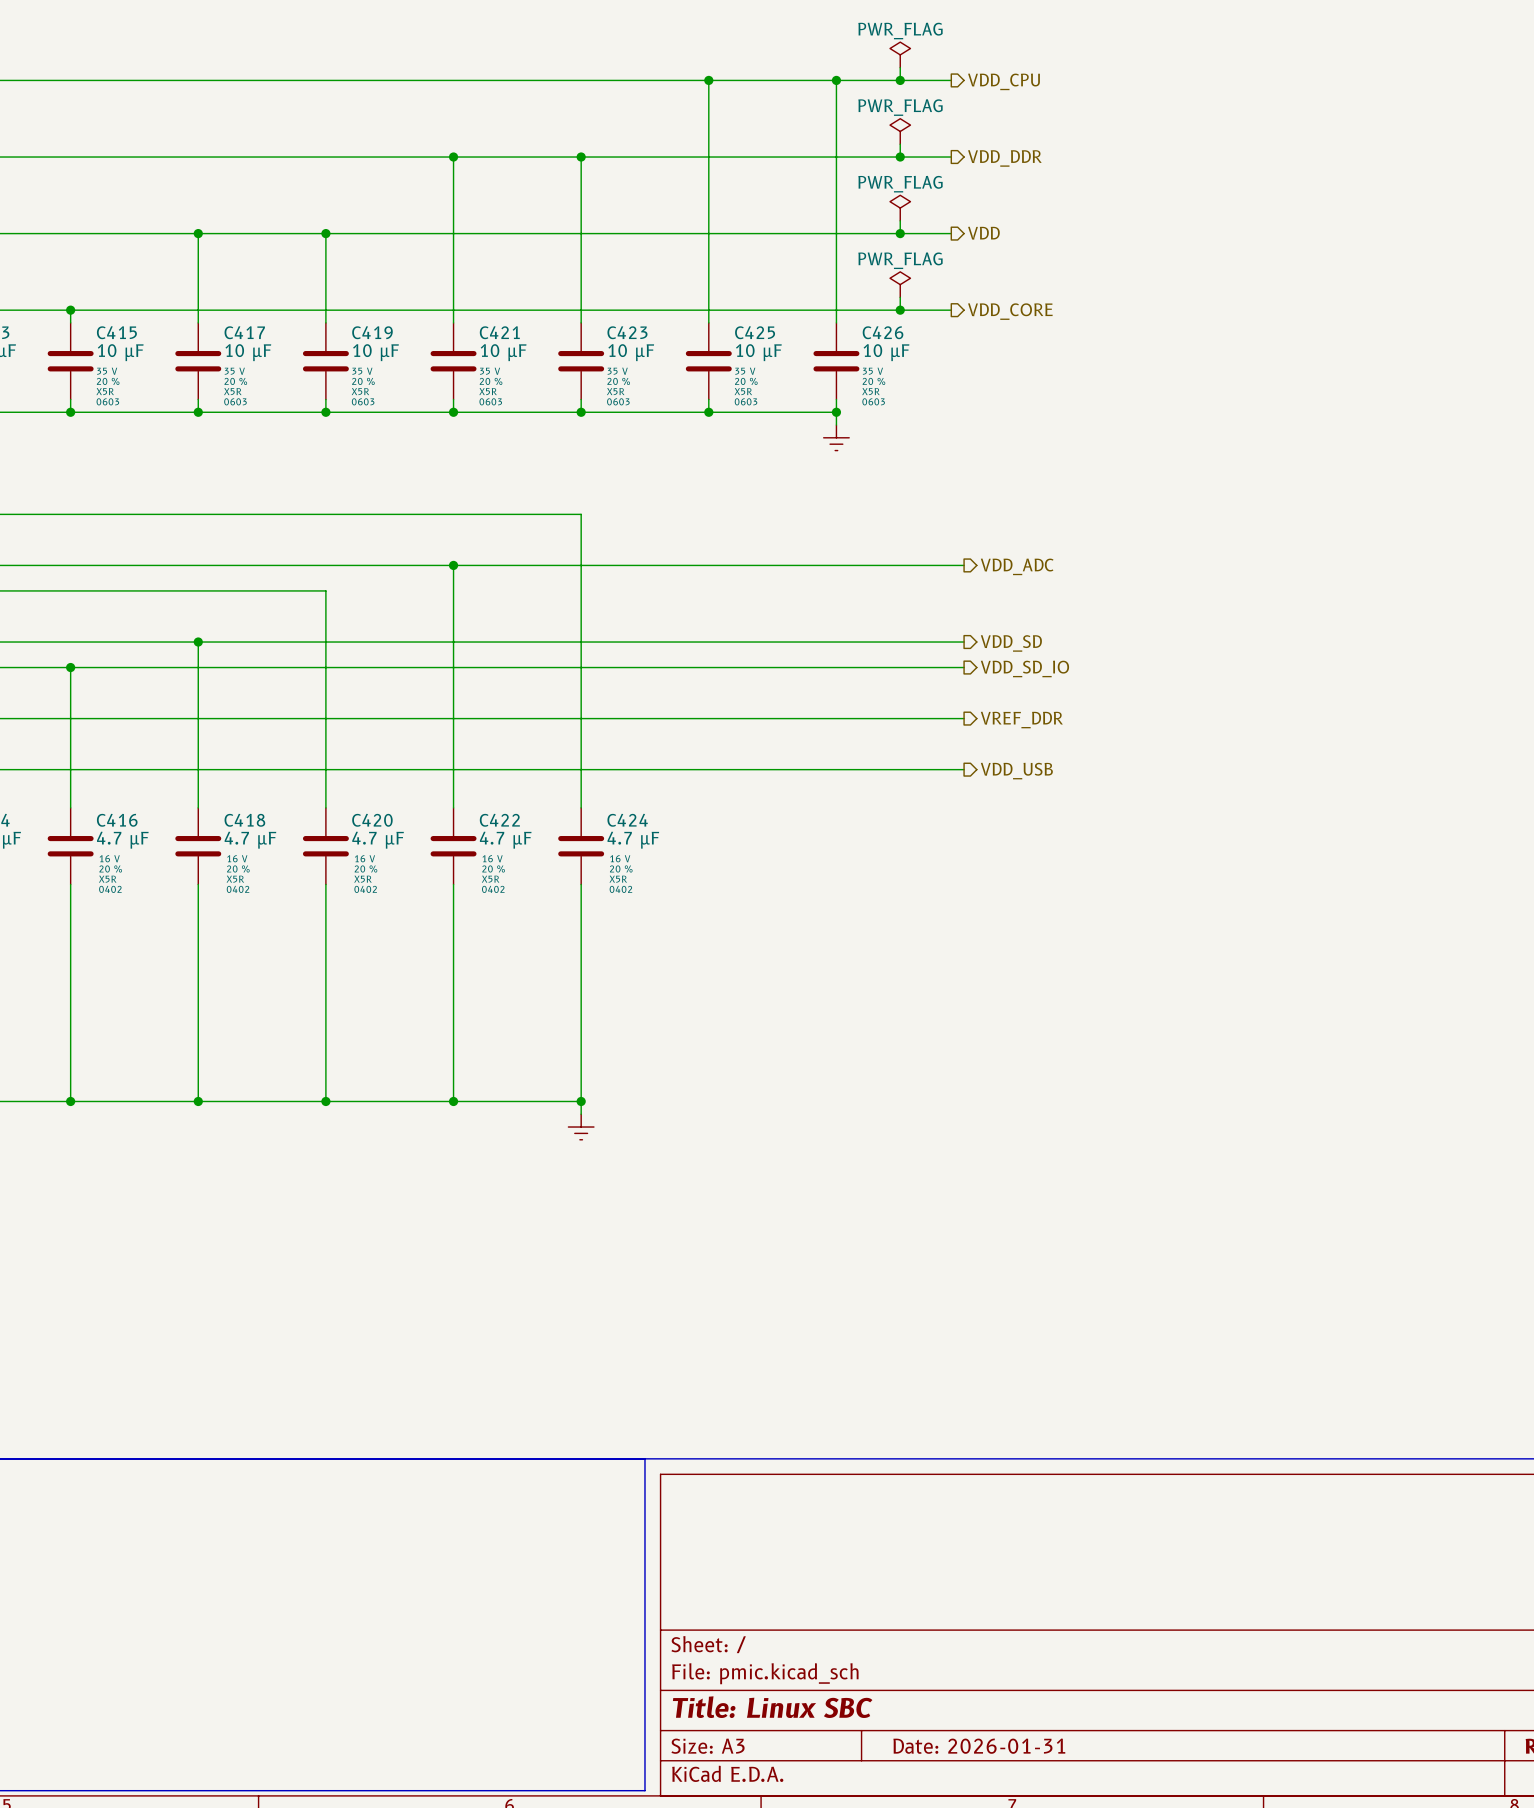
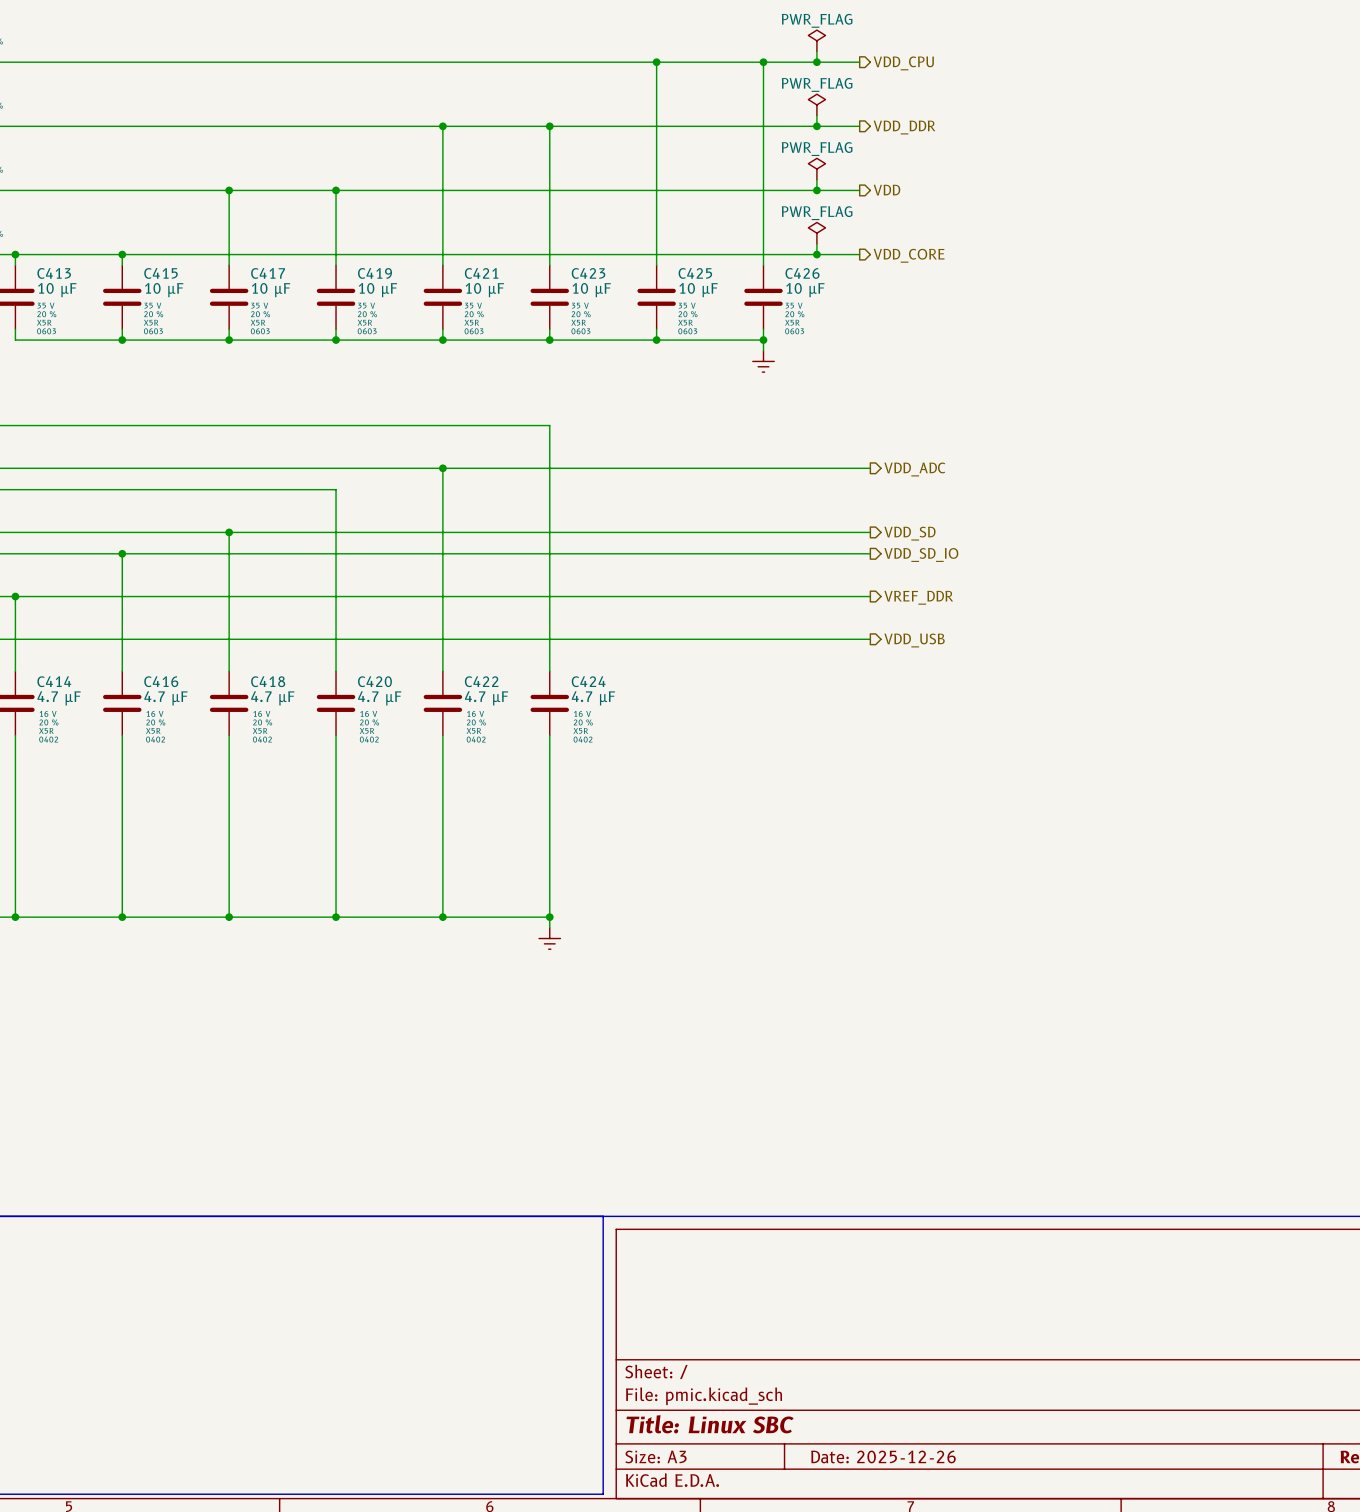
title block: Date: 2026-01-31 (979, 1746) -> Date: 2025-12-26 (883, 1456)

